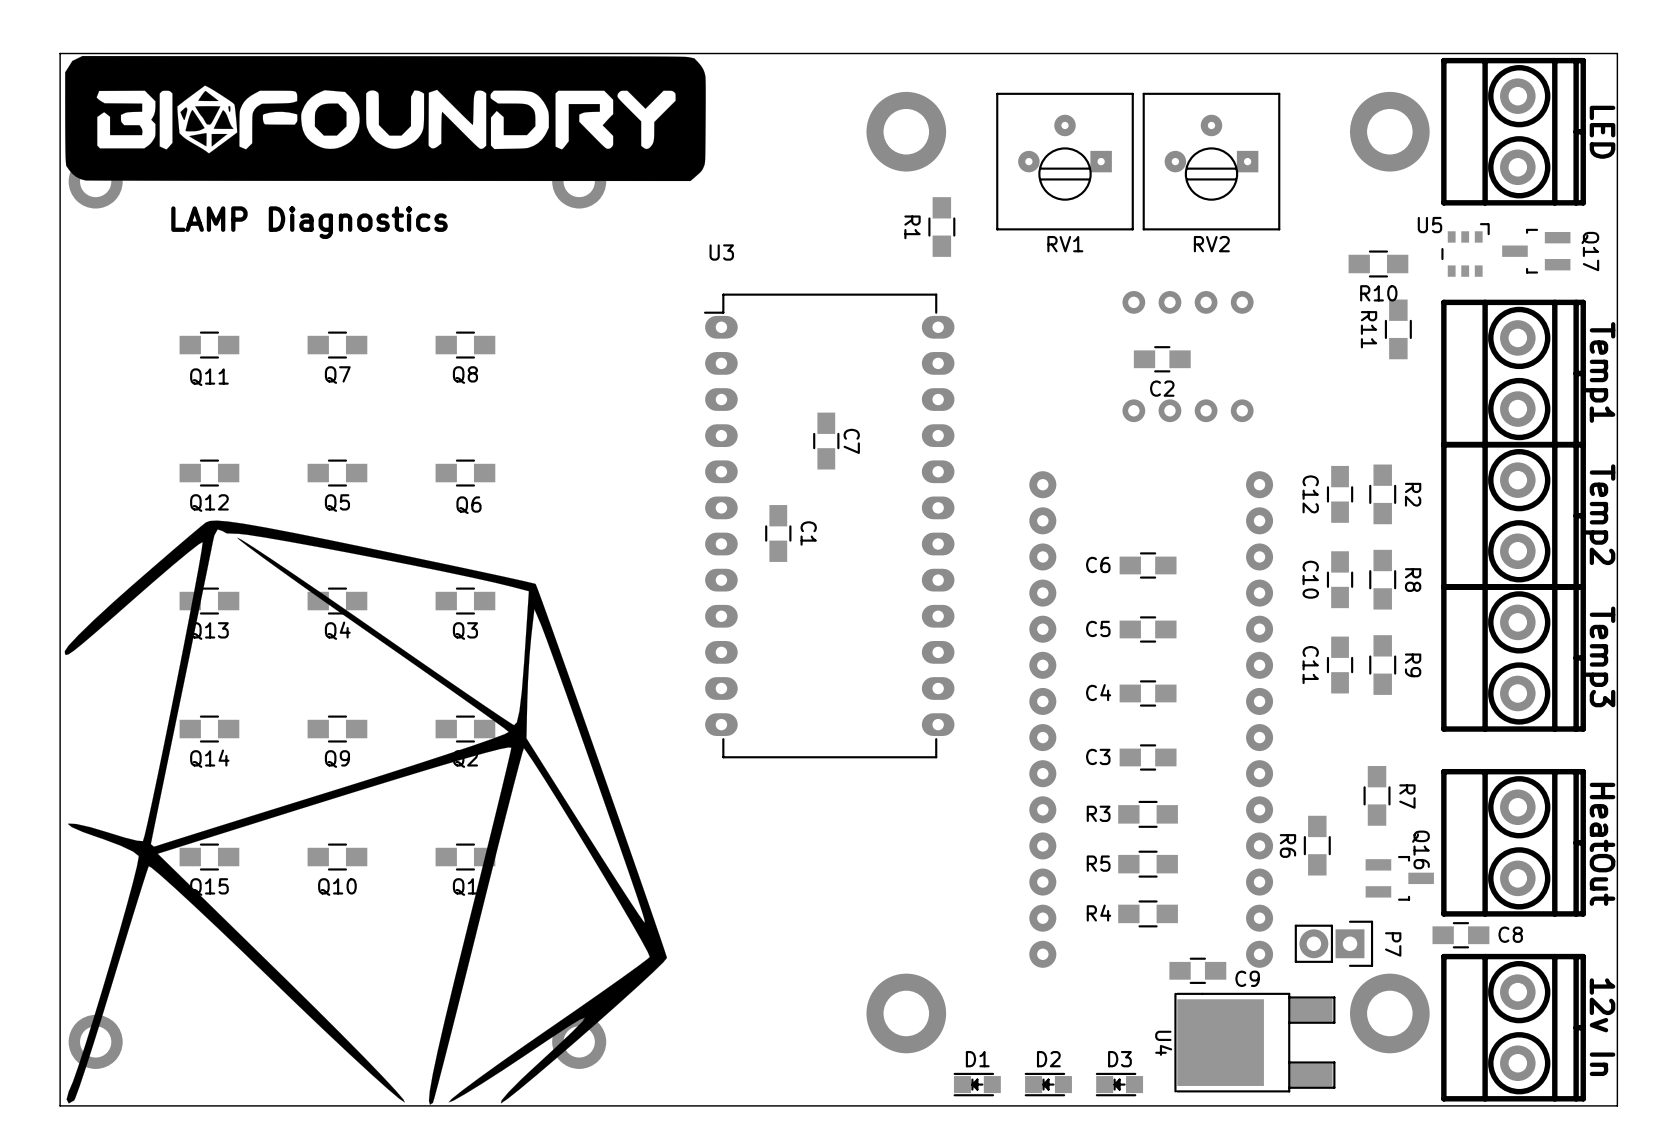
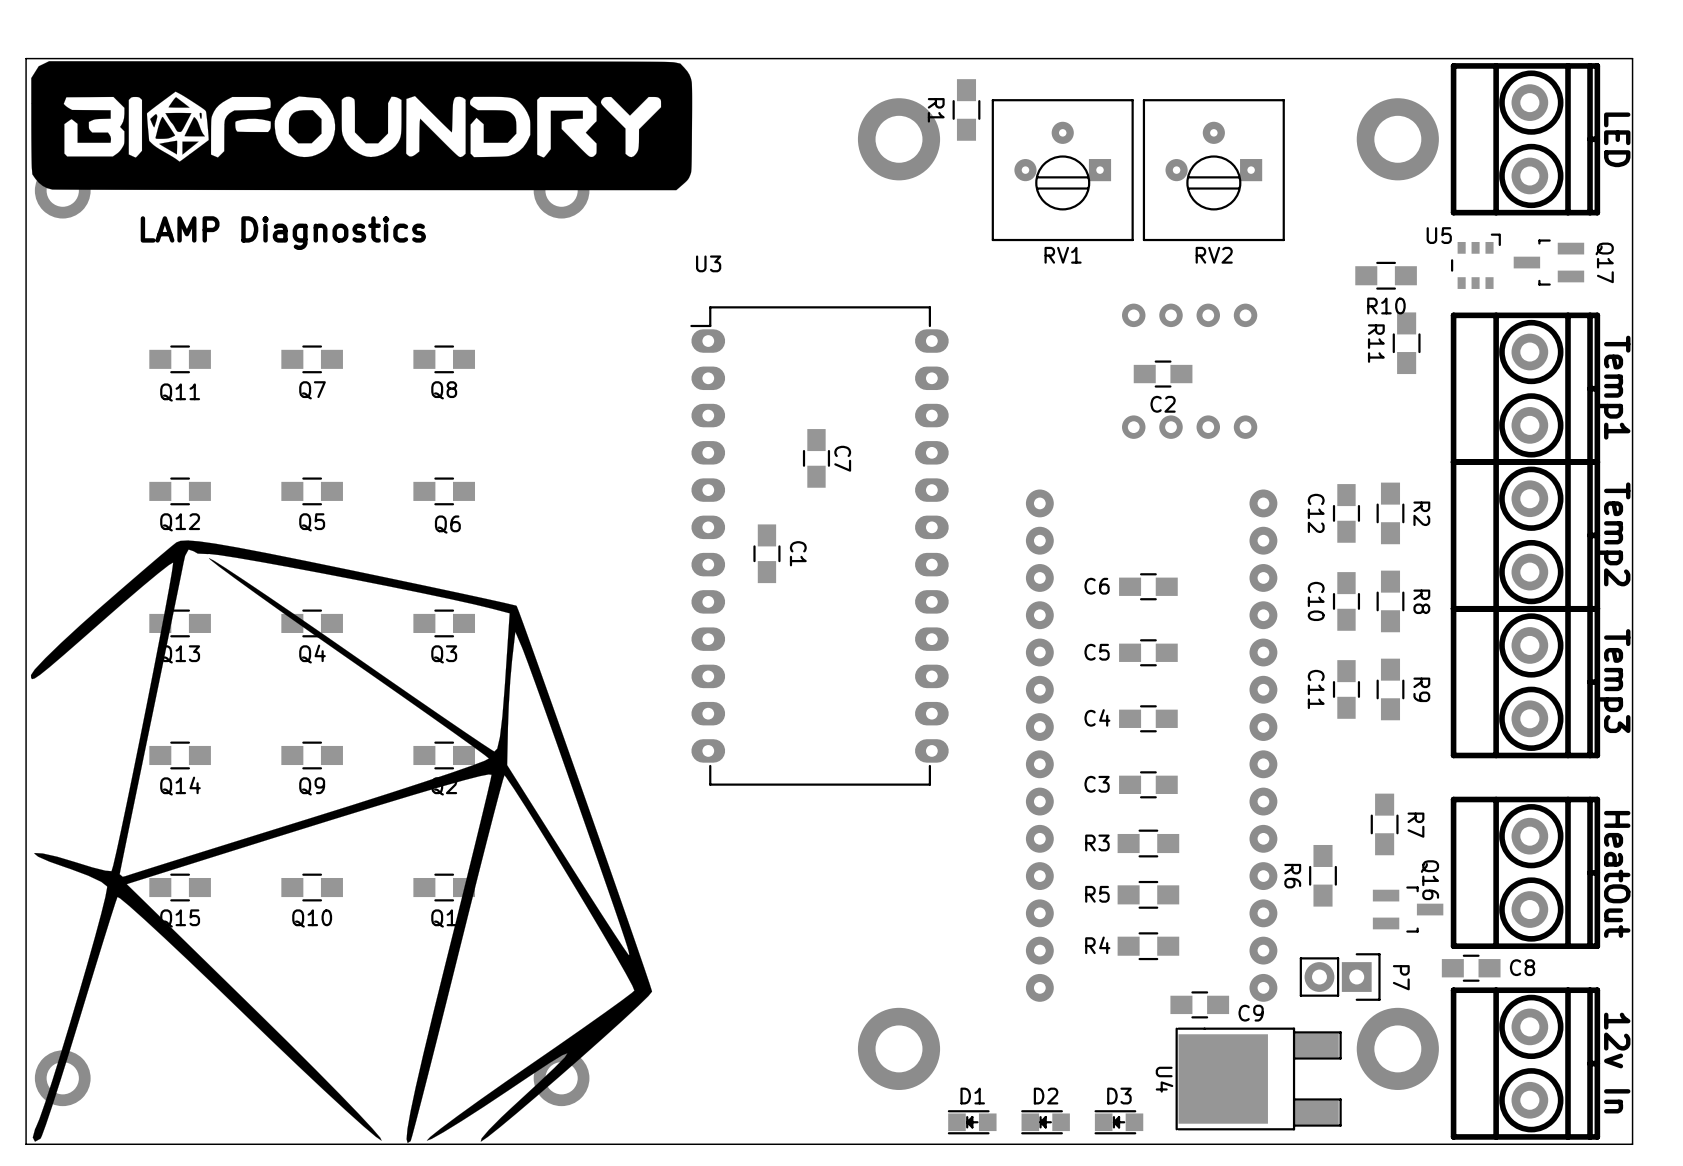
R1 position: (941, 227) -> (966, 109)

